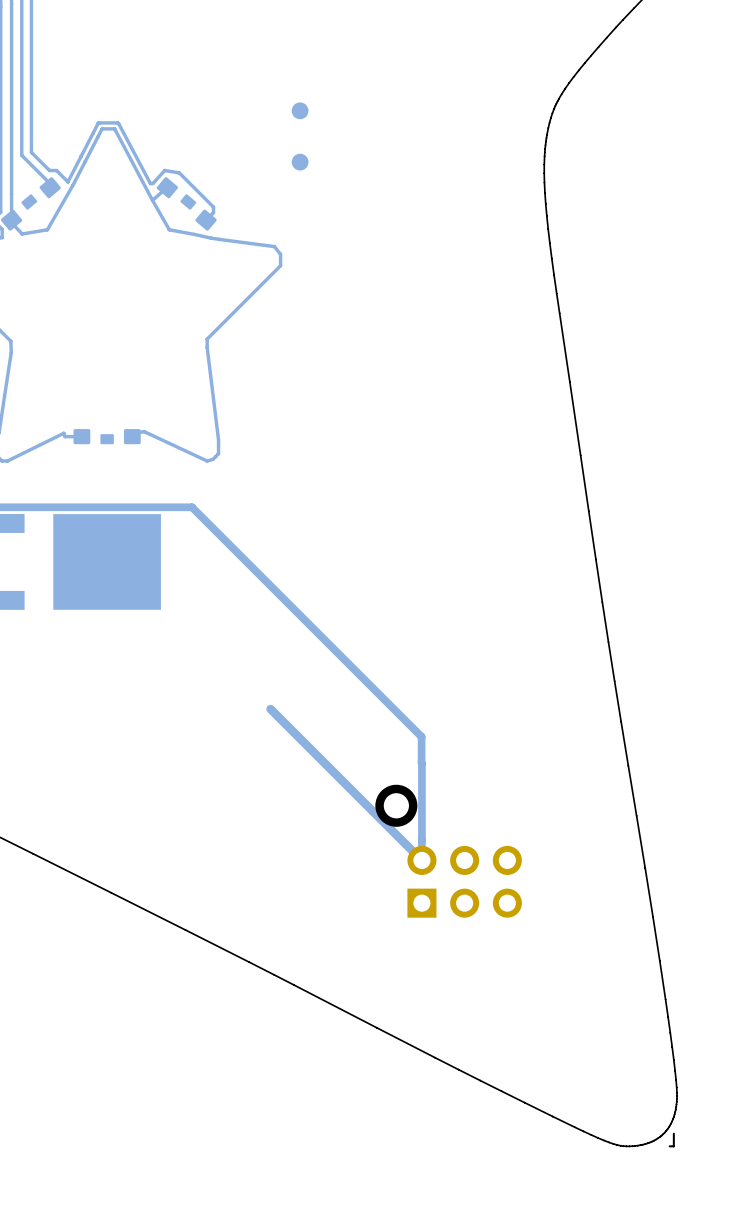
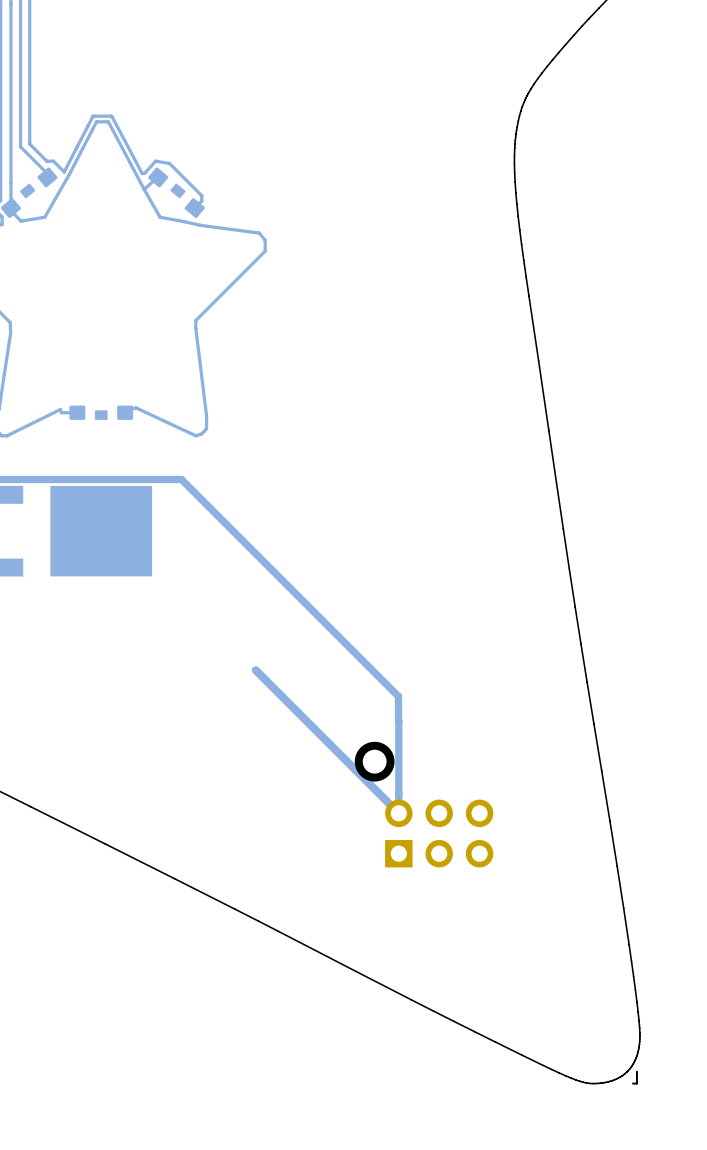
part: (300, 110) -> none
part: (300, 162) -> none

